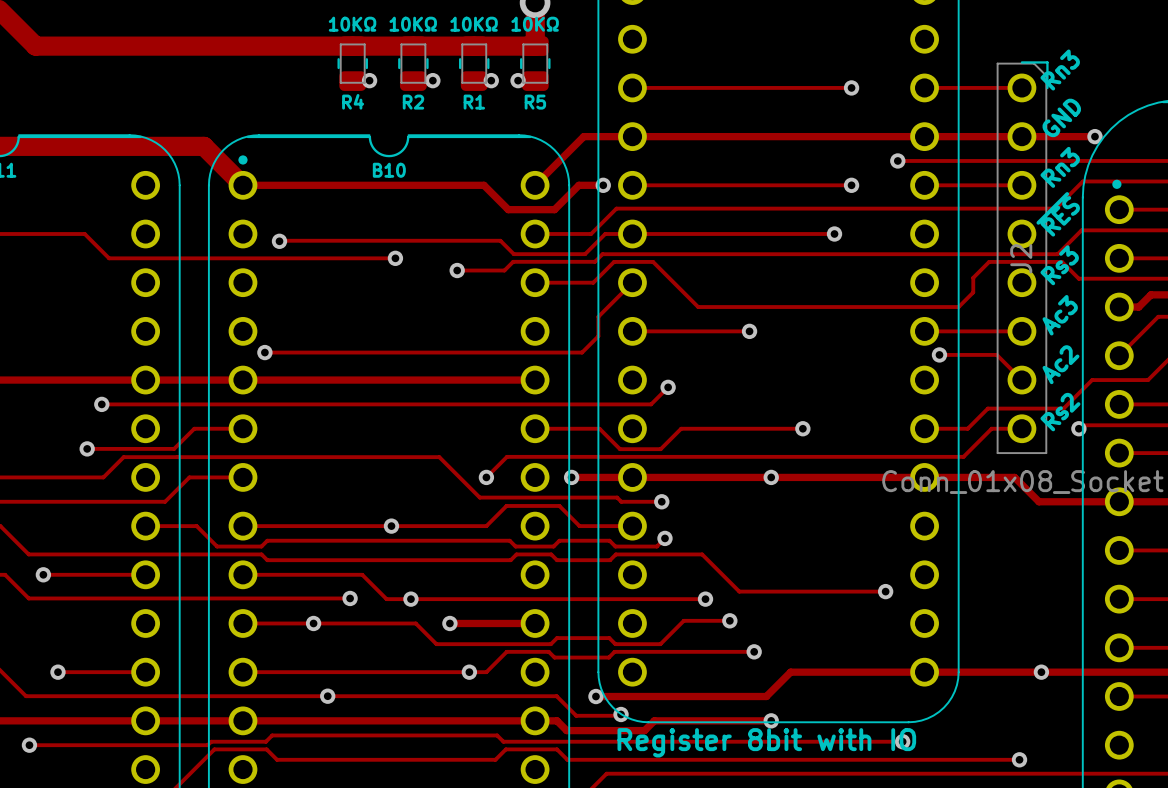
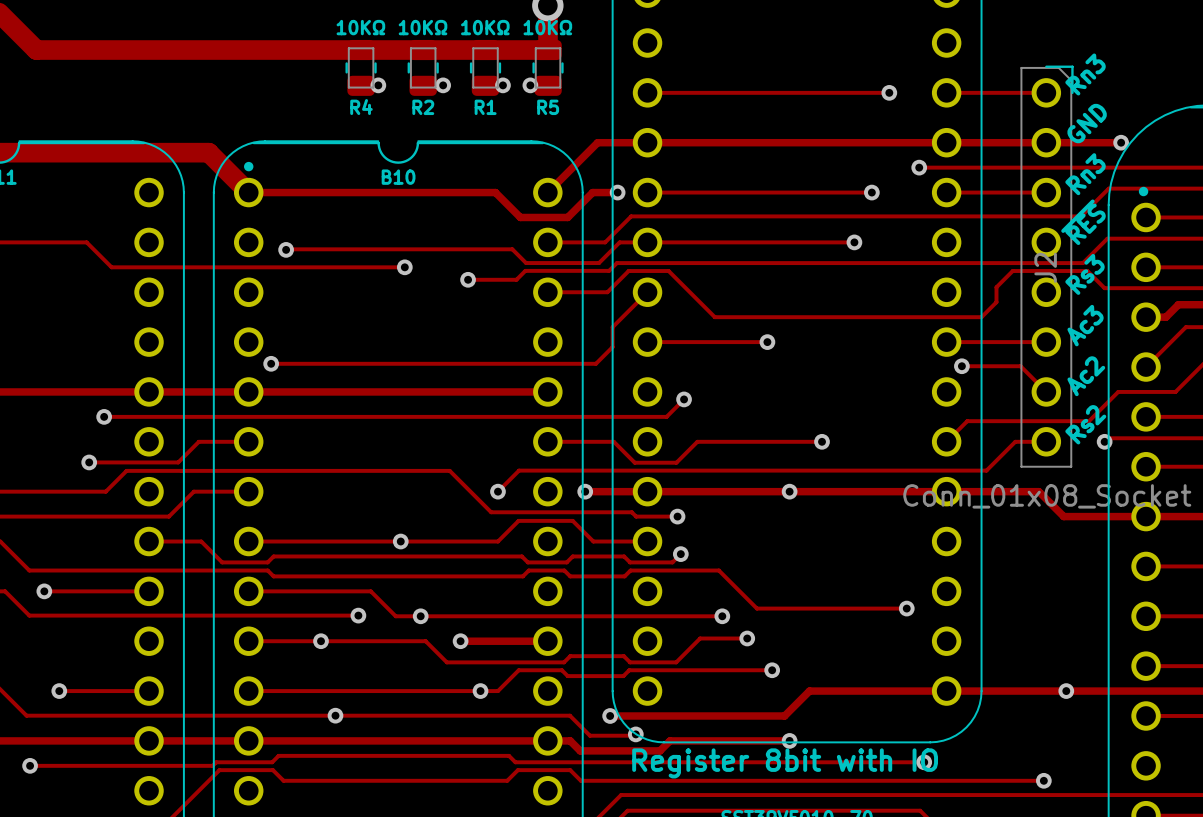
track: none -> (871, 92) (889, 92)
via position: (851, 87) -> (889, 92)
track: (987, 408) (967, 428) (924, 428) -> (1011, 421) (967, 421) (946, 441)

